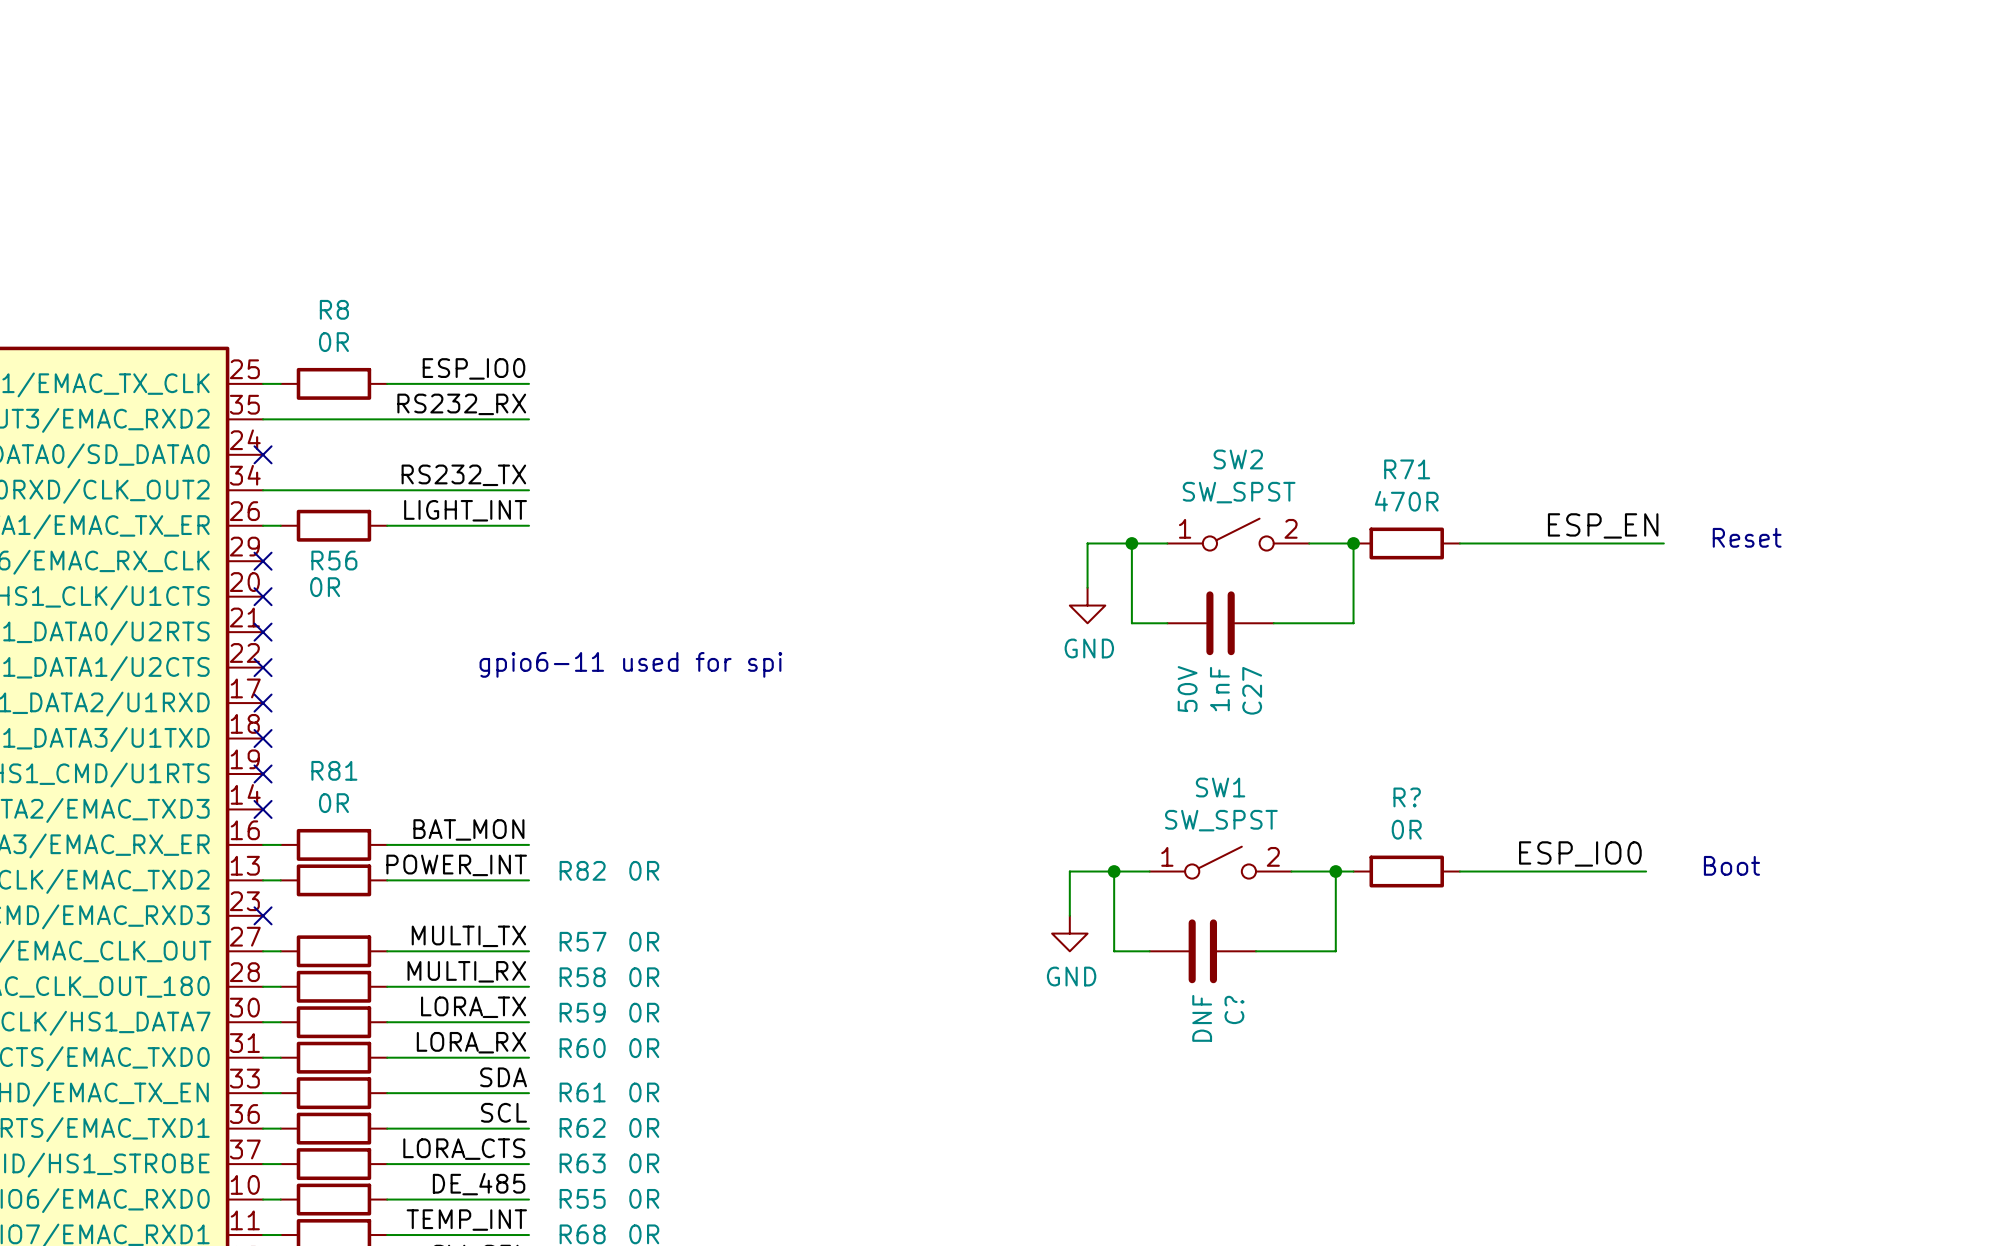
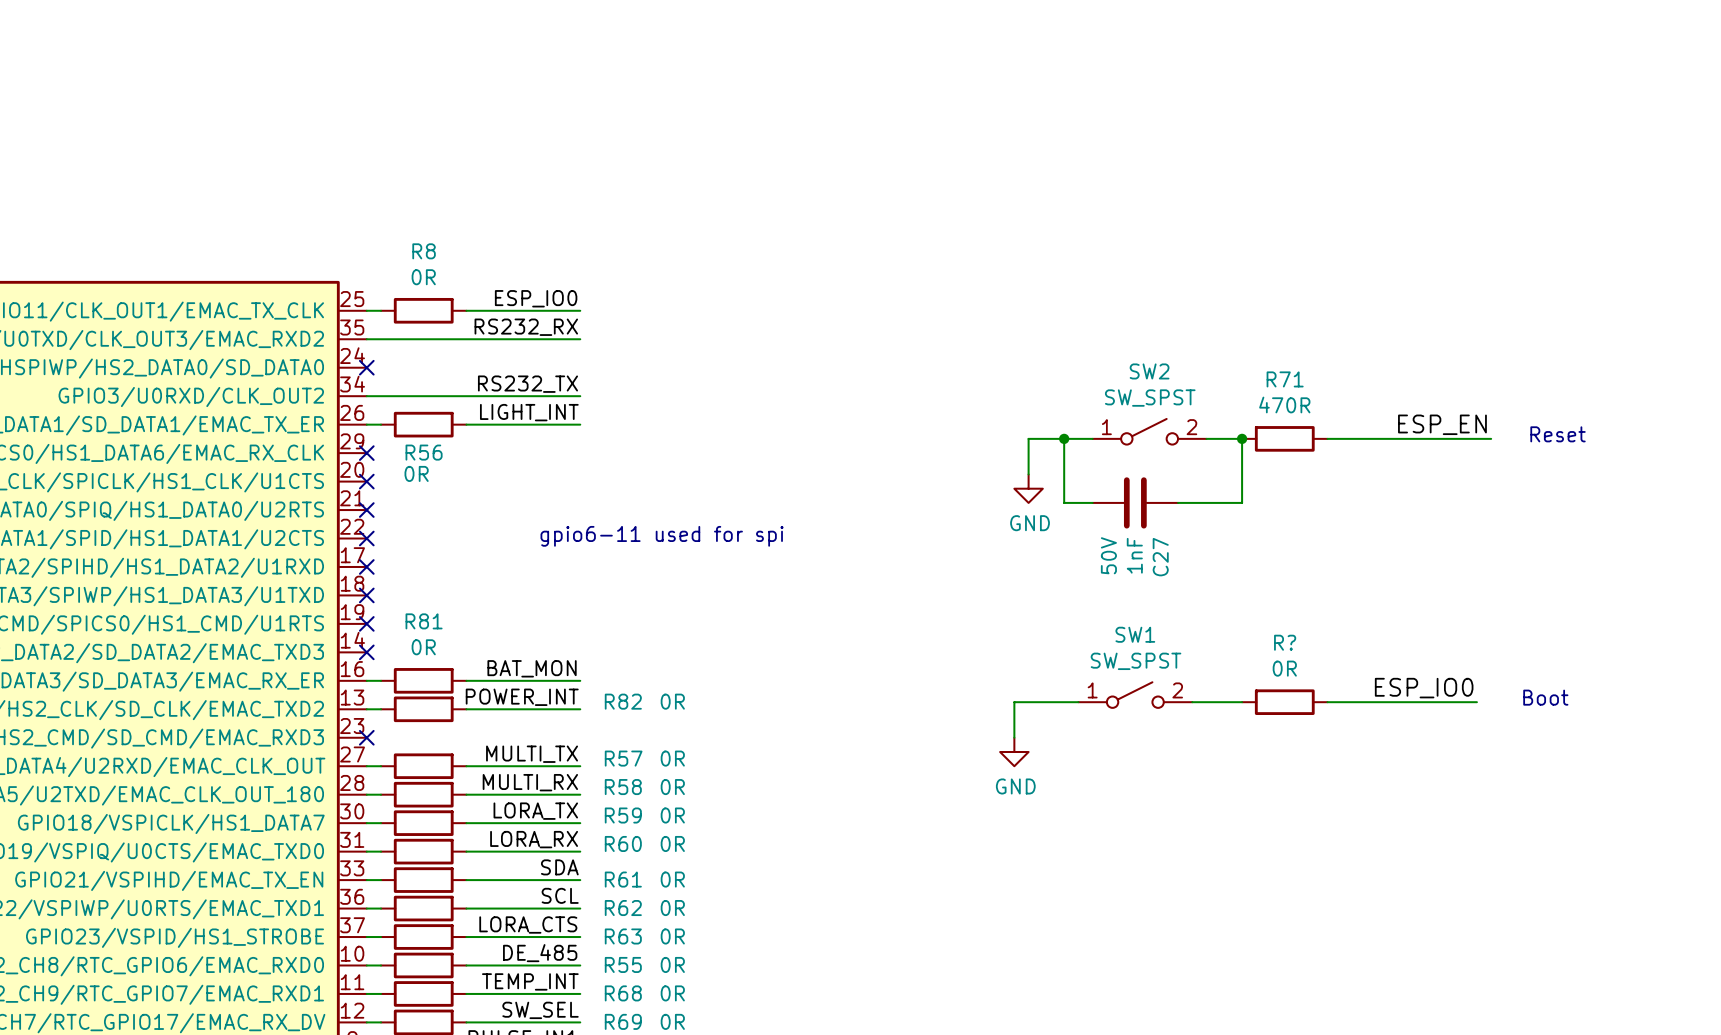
wire: (1114, 871) (1114, 951) (1149, 951) -> none
junction: (1114, 871) -> none
wire: (1335, 871) (1335, 951) (1256, 951) -> none
junction: (1335, 871) -> none
C?: DNF (1202, 951) -> none

